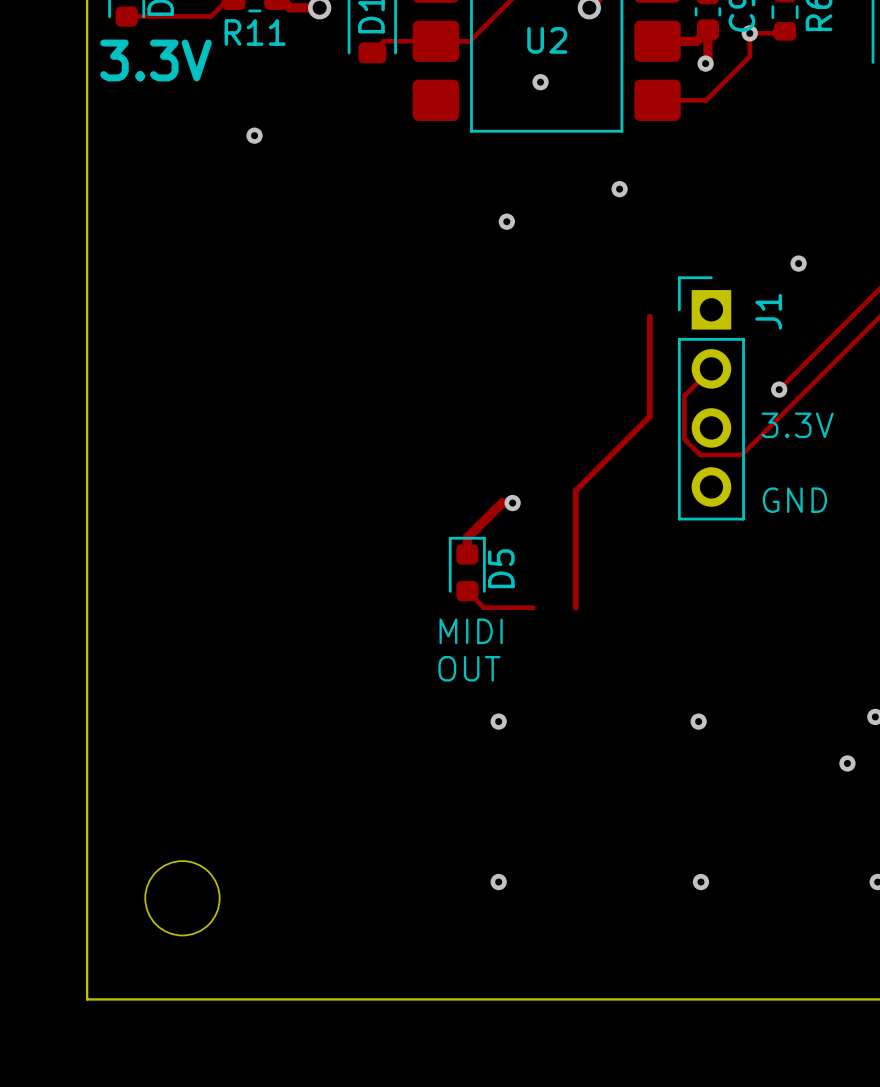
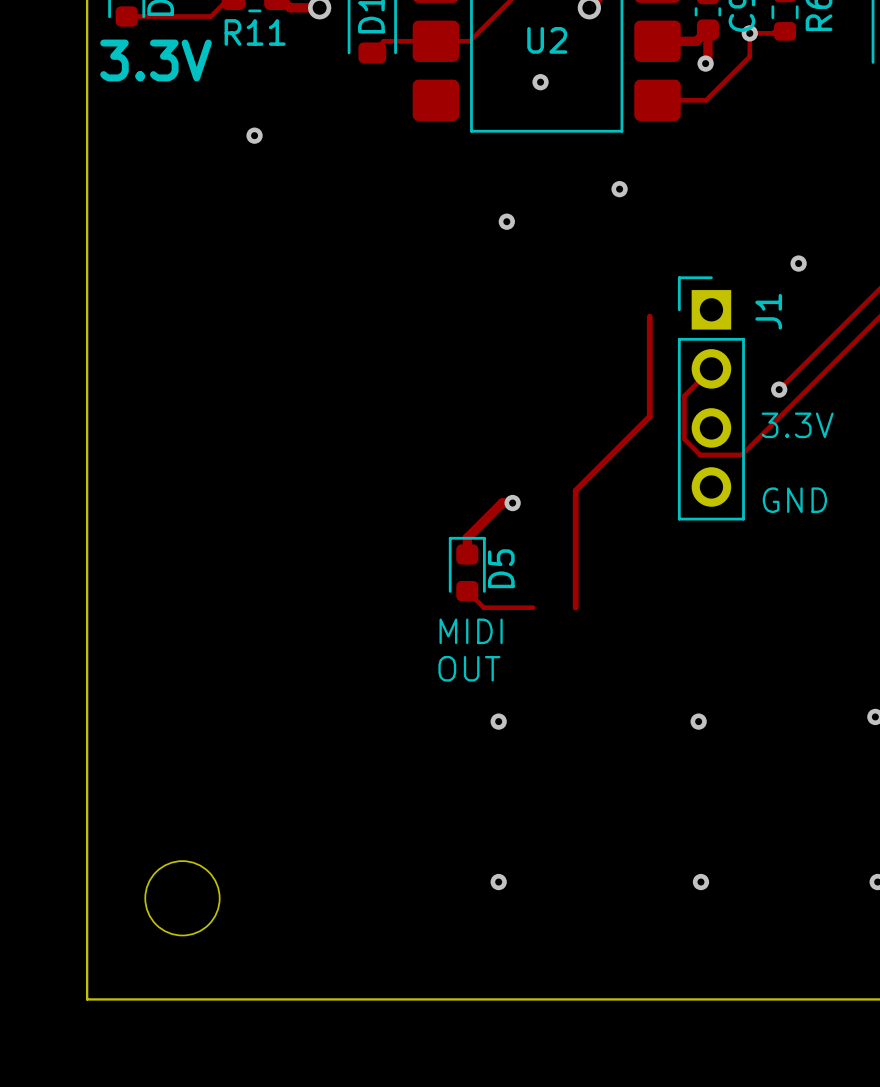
via: (847, 763) -> none

